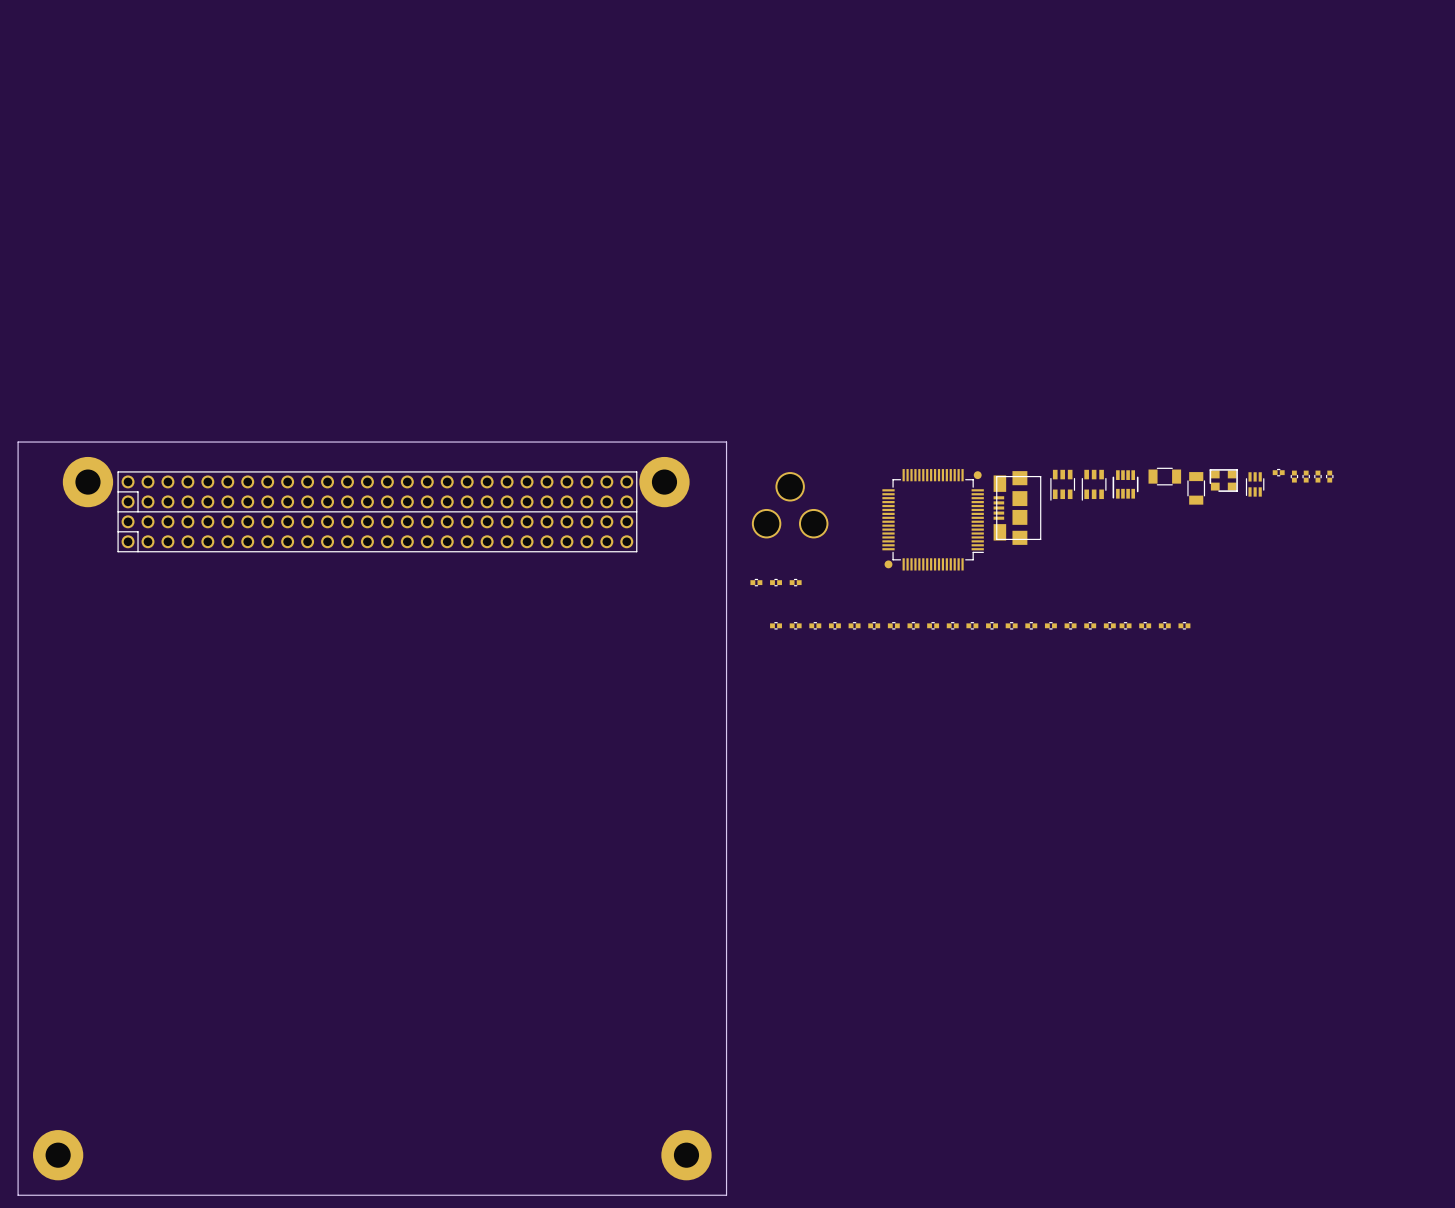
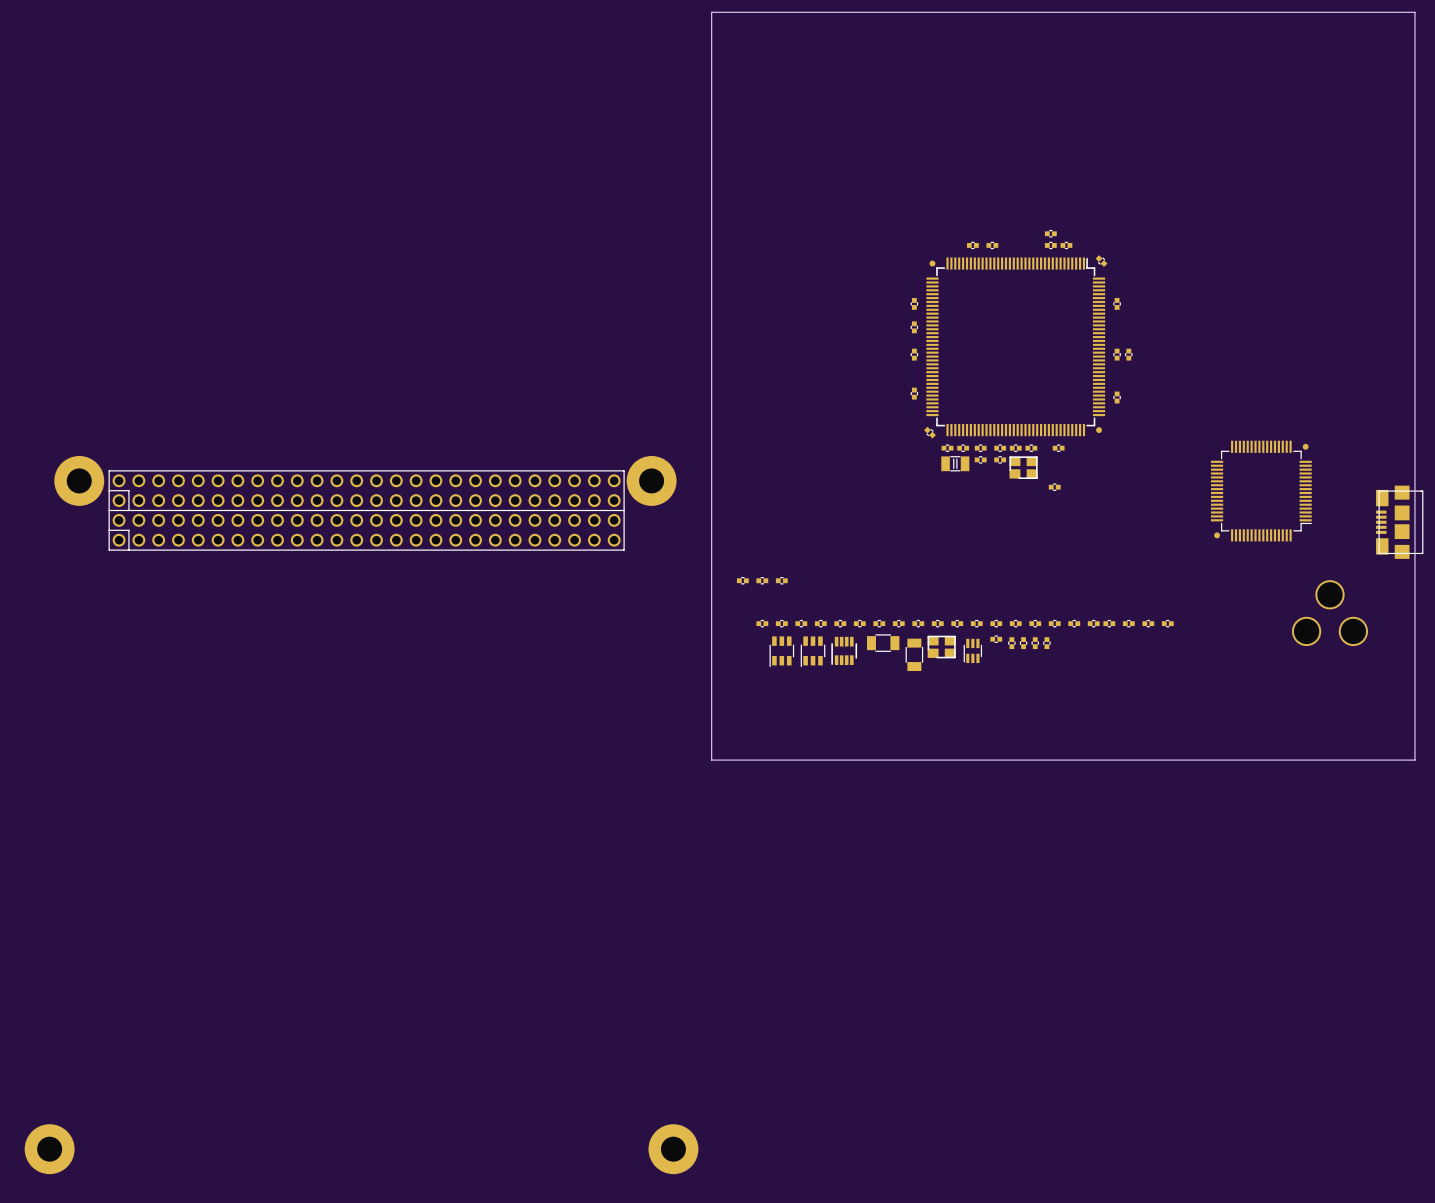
board edge: none -> (711, 12) (711, 760) (1414, 760) (1414, 12) (711, 12)
part: none -> (1050, 233)
part: none -> (972, 245)
part: none -> (992, 245)
part: none -> (1050, 245)
part: none -> (1066, 245)
part: none -> (1101, 261)
part: none -> (914, 303)
part: none -> (1117, 303)
part: none -> (914, 327)
part: none -> (1015, 346)
part: none -> (914, 354)
part: none -> (1117, 354)
part: none -> (1128, 354)
part: none -> (914, 393)
part: none -> (1117, 397)
part: none -> (929, 432)
board edge: (18, 442) (18, 1195) (726, 1195) (726, 442) (18, 442) -> none
part: none -> (947, 448)
part: none -> (963, 448)
part: none -> (980, 448)
part: none -> (1000, 448)
part: none -> (1015, 448)
part: none -> (1031, 448)
part: none -> (1058, 448)
part: none -> (980, 459)
part: none -> (1000, 459)
part: none -> (955, 463)
part: none -> (1023, 467)
part: (1278, 472) -> none
part: (1164, 476) -> none
part: (1294, 476) -> none
part: (1306, 476) -> none
part: (1317, 476) -> none
part: (1329, 476) -> none
part: (1223, 480) -> none
part: (1125, 484) -> none
part: (1255, 484) -> none
part: (1062, 485) -> none
part: (1094, 485) -> none
part: none -> (1054, 487)
part: (1196, 488) -> none
part: none -> (1261, 491)
part: (790, 505) -> none
part: (1017, 507) -> none
part: (933, 519) -> none
part: none -> (1399, 522)
part: none -> (1329, 613)
part: none -> (996, 639)
part: none -> (883, 643)
part: none -> (1011, 643)
part: none -> (1023, 643)
part: none -> (1035, 643)
part: none -> (1046, 643)
part: none -> (941, 647)
part: none -> (844, 650)
part: none -> (972, 650)
part: none -> (781, 651)
part: none -> (813, 651)
part: none -> (914, 654)

